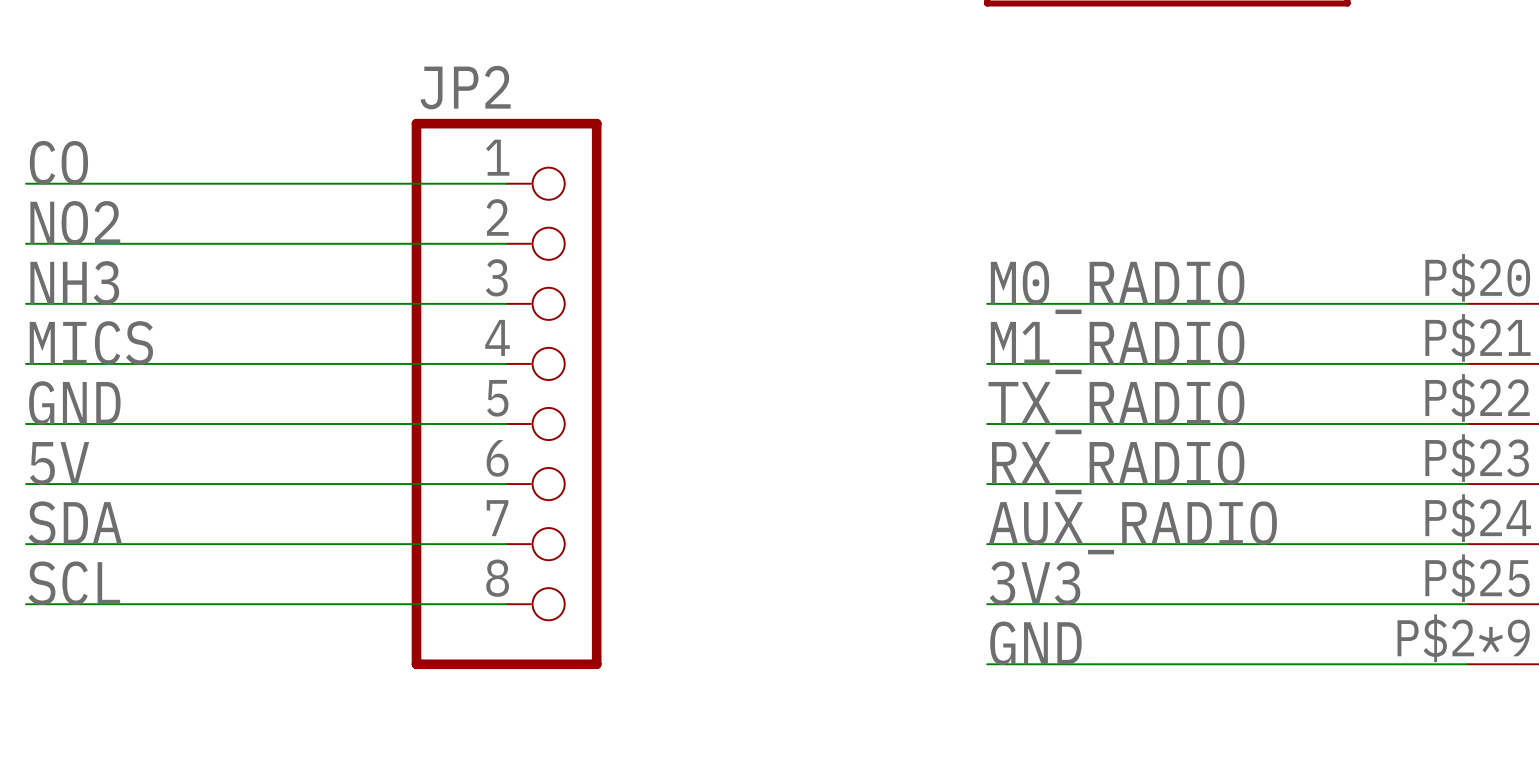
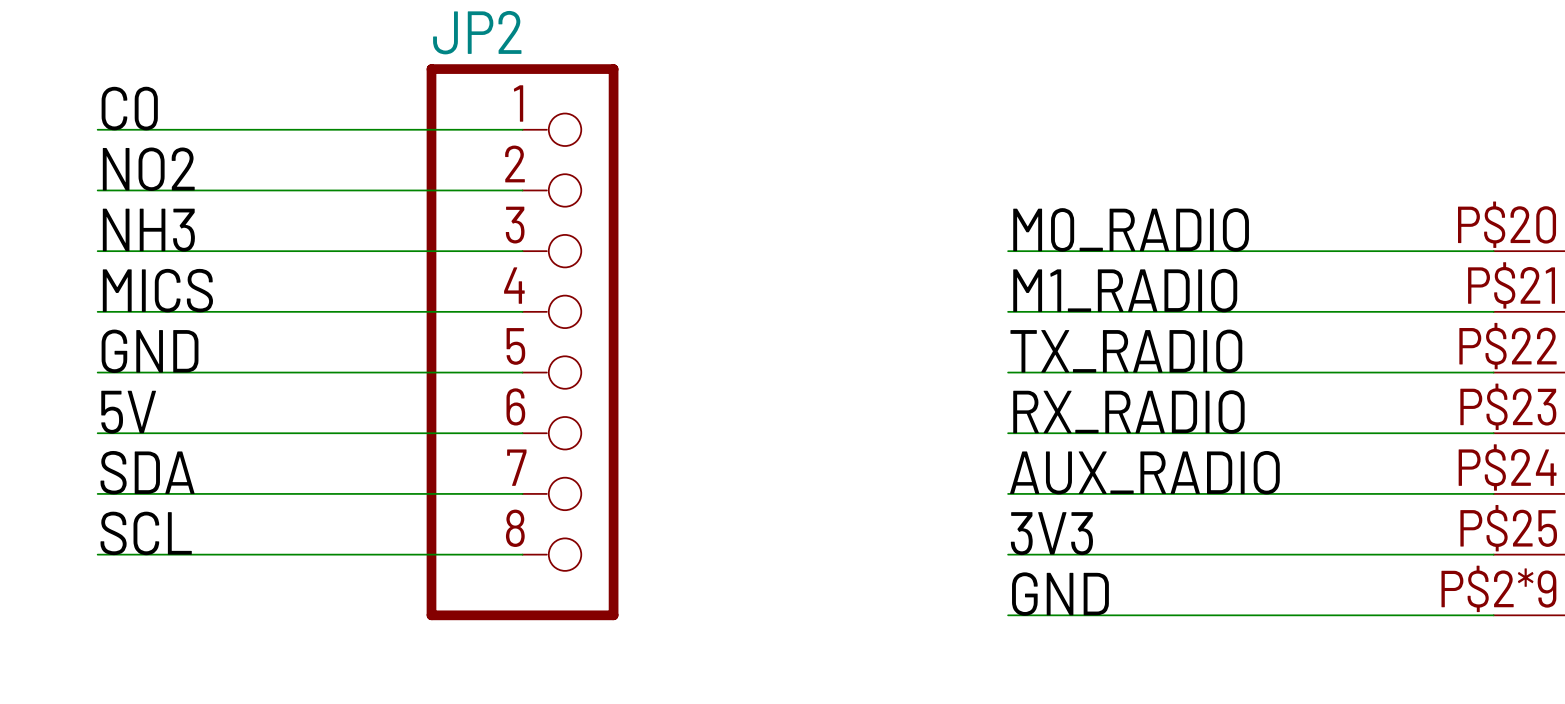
label: CO (58, 162) -> none
label: none -> C0 (129, 108)
wire: (26, 183) (86, 183) -> none
label position: NO2 (75, 222) -> NO2 (148, 169)
wire: (26, 243) (86, 243) -> none
label position: NH3 (74, 282) -> NH3 (148, 230)
wire: (26, 303) (86, 303) -> none
label position: MICS (91, 342) -> MICS (157, 290)
wire: (26, 363) (86, 363) -> none
label position: GND (74, 402) -> GND (150, 351)
wire: (26, 424) (86, 424) -> none
label position: 5V (59, 463) -> 5V (128, 412)
wire: (26, 484) (86, 484) -> none
label position: SDA (75, 523) -> SDA (147, 472)
wire: (26, 544) (86, 544) -> none
label position: SCL (74, 583) -> SCL (146, 533)
wire: (26, 604) (86, 604) -> none

